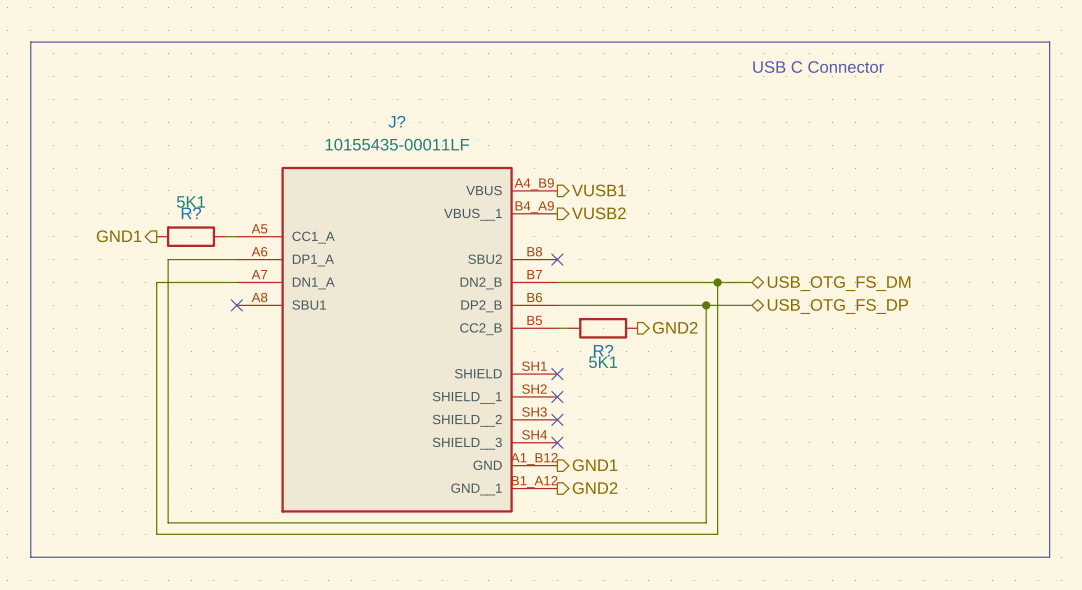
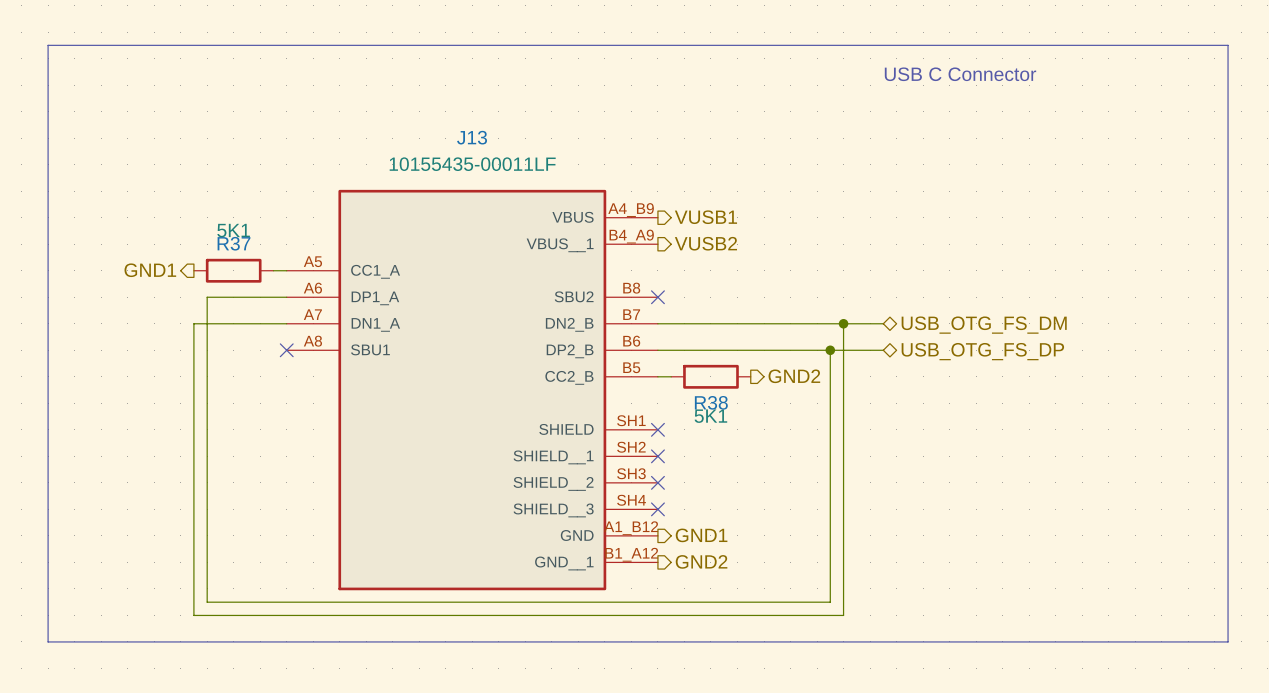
J? name: J? (396, 121) -> J13 (472, 137)
R? name: R? (191, 213) -> R37 (234, 243)
R? name: R? (603, 350) -> R38 (711, 402)

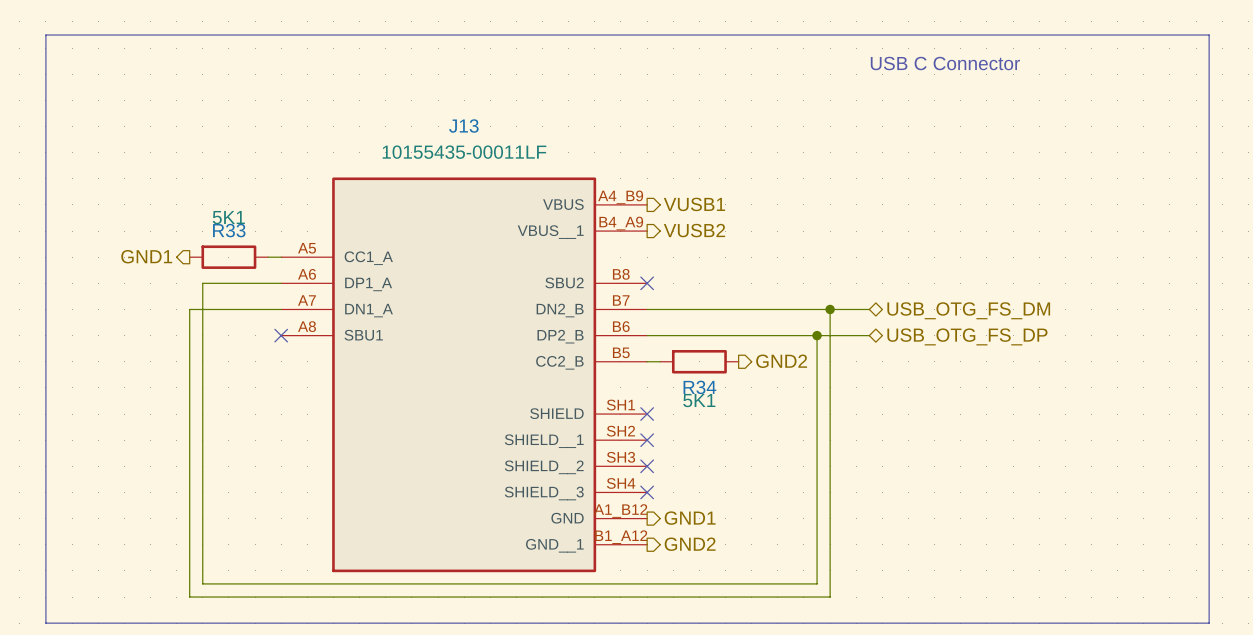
R37 name: R37 (234, 243) -> R33 (229, 230)
R38 name: R38 (711, 402) -> R34 (699, 387)

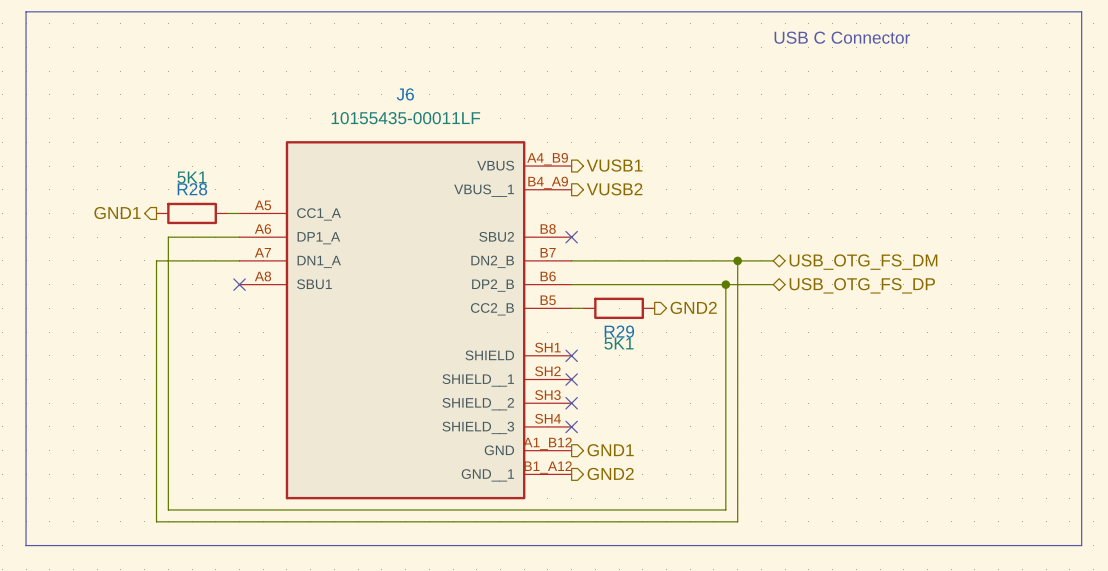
J13 name: J13 (463, 126) -> J6 (405, 94)
R33 name: R33 (229, 230) -> R28 (192, 189)
R34 name: R34 (699, 387) -> R29 (619, 331)

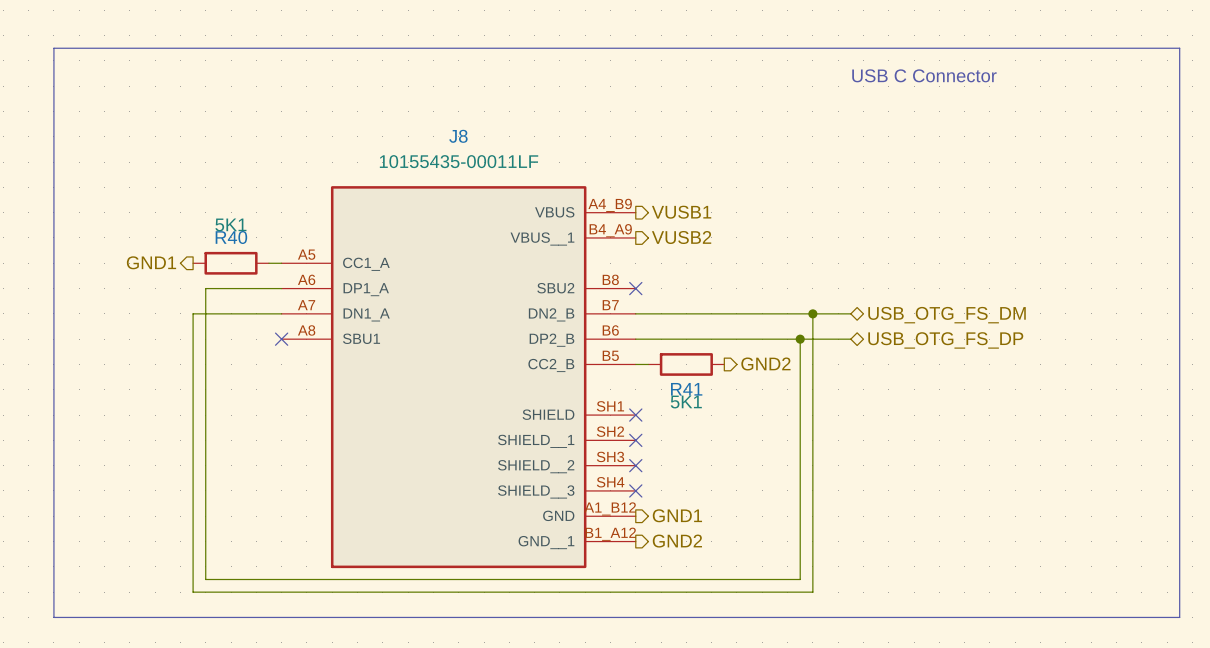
J6 name: J6 (405, 94) -> J8 (458, 136)
R28 name: R28 (192, 189) -> R40 (231, 237)
R29 name: R29 (619, 331) -> R41 (686, 389)

